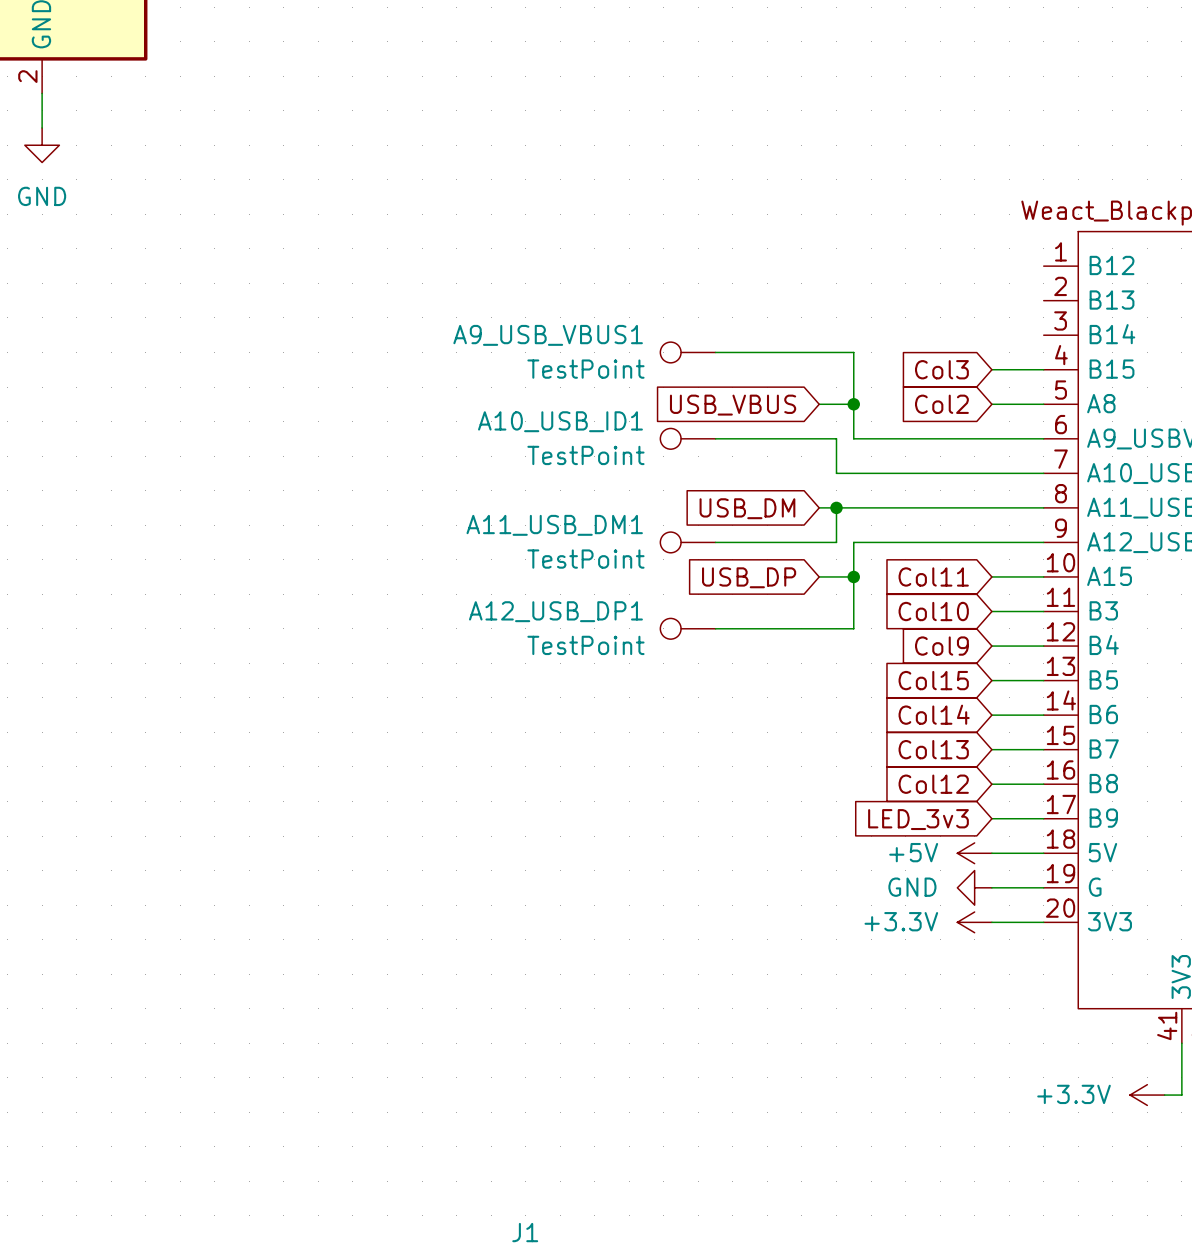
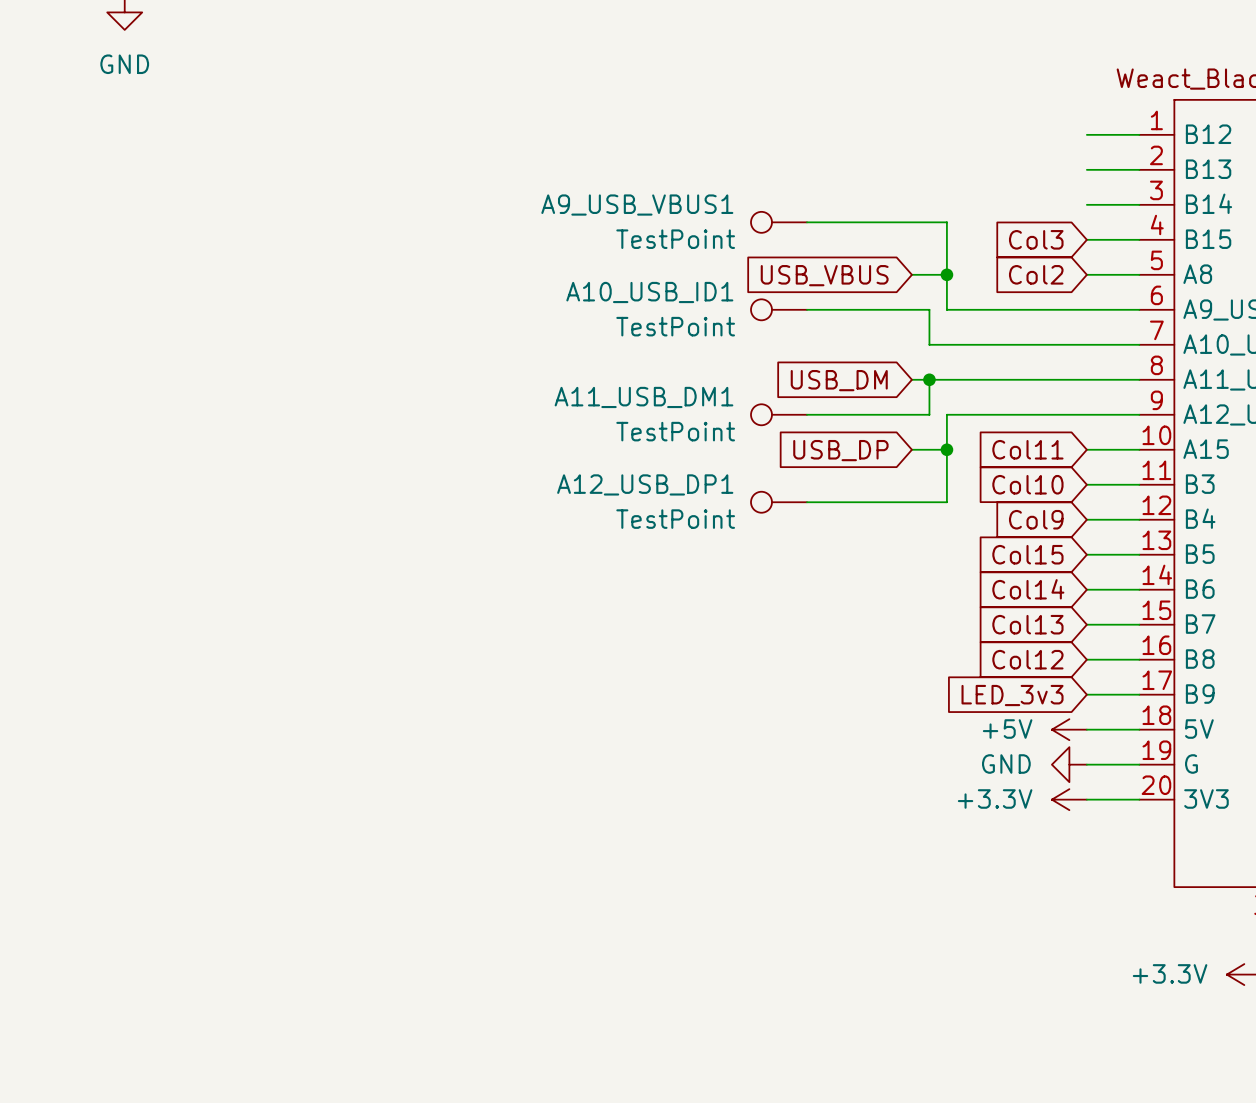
wire: none -> (1086, 134) (1139, 134)
wire: none -> (1086, 169) (1139, 169)
wire: none -> (1086, 204) (1139, 204)

